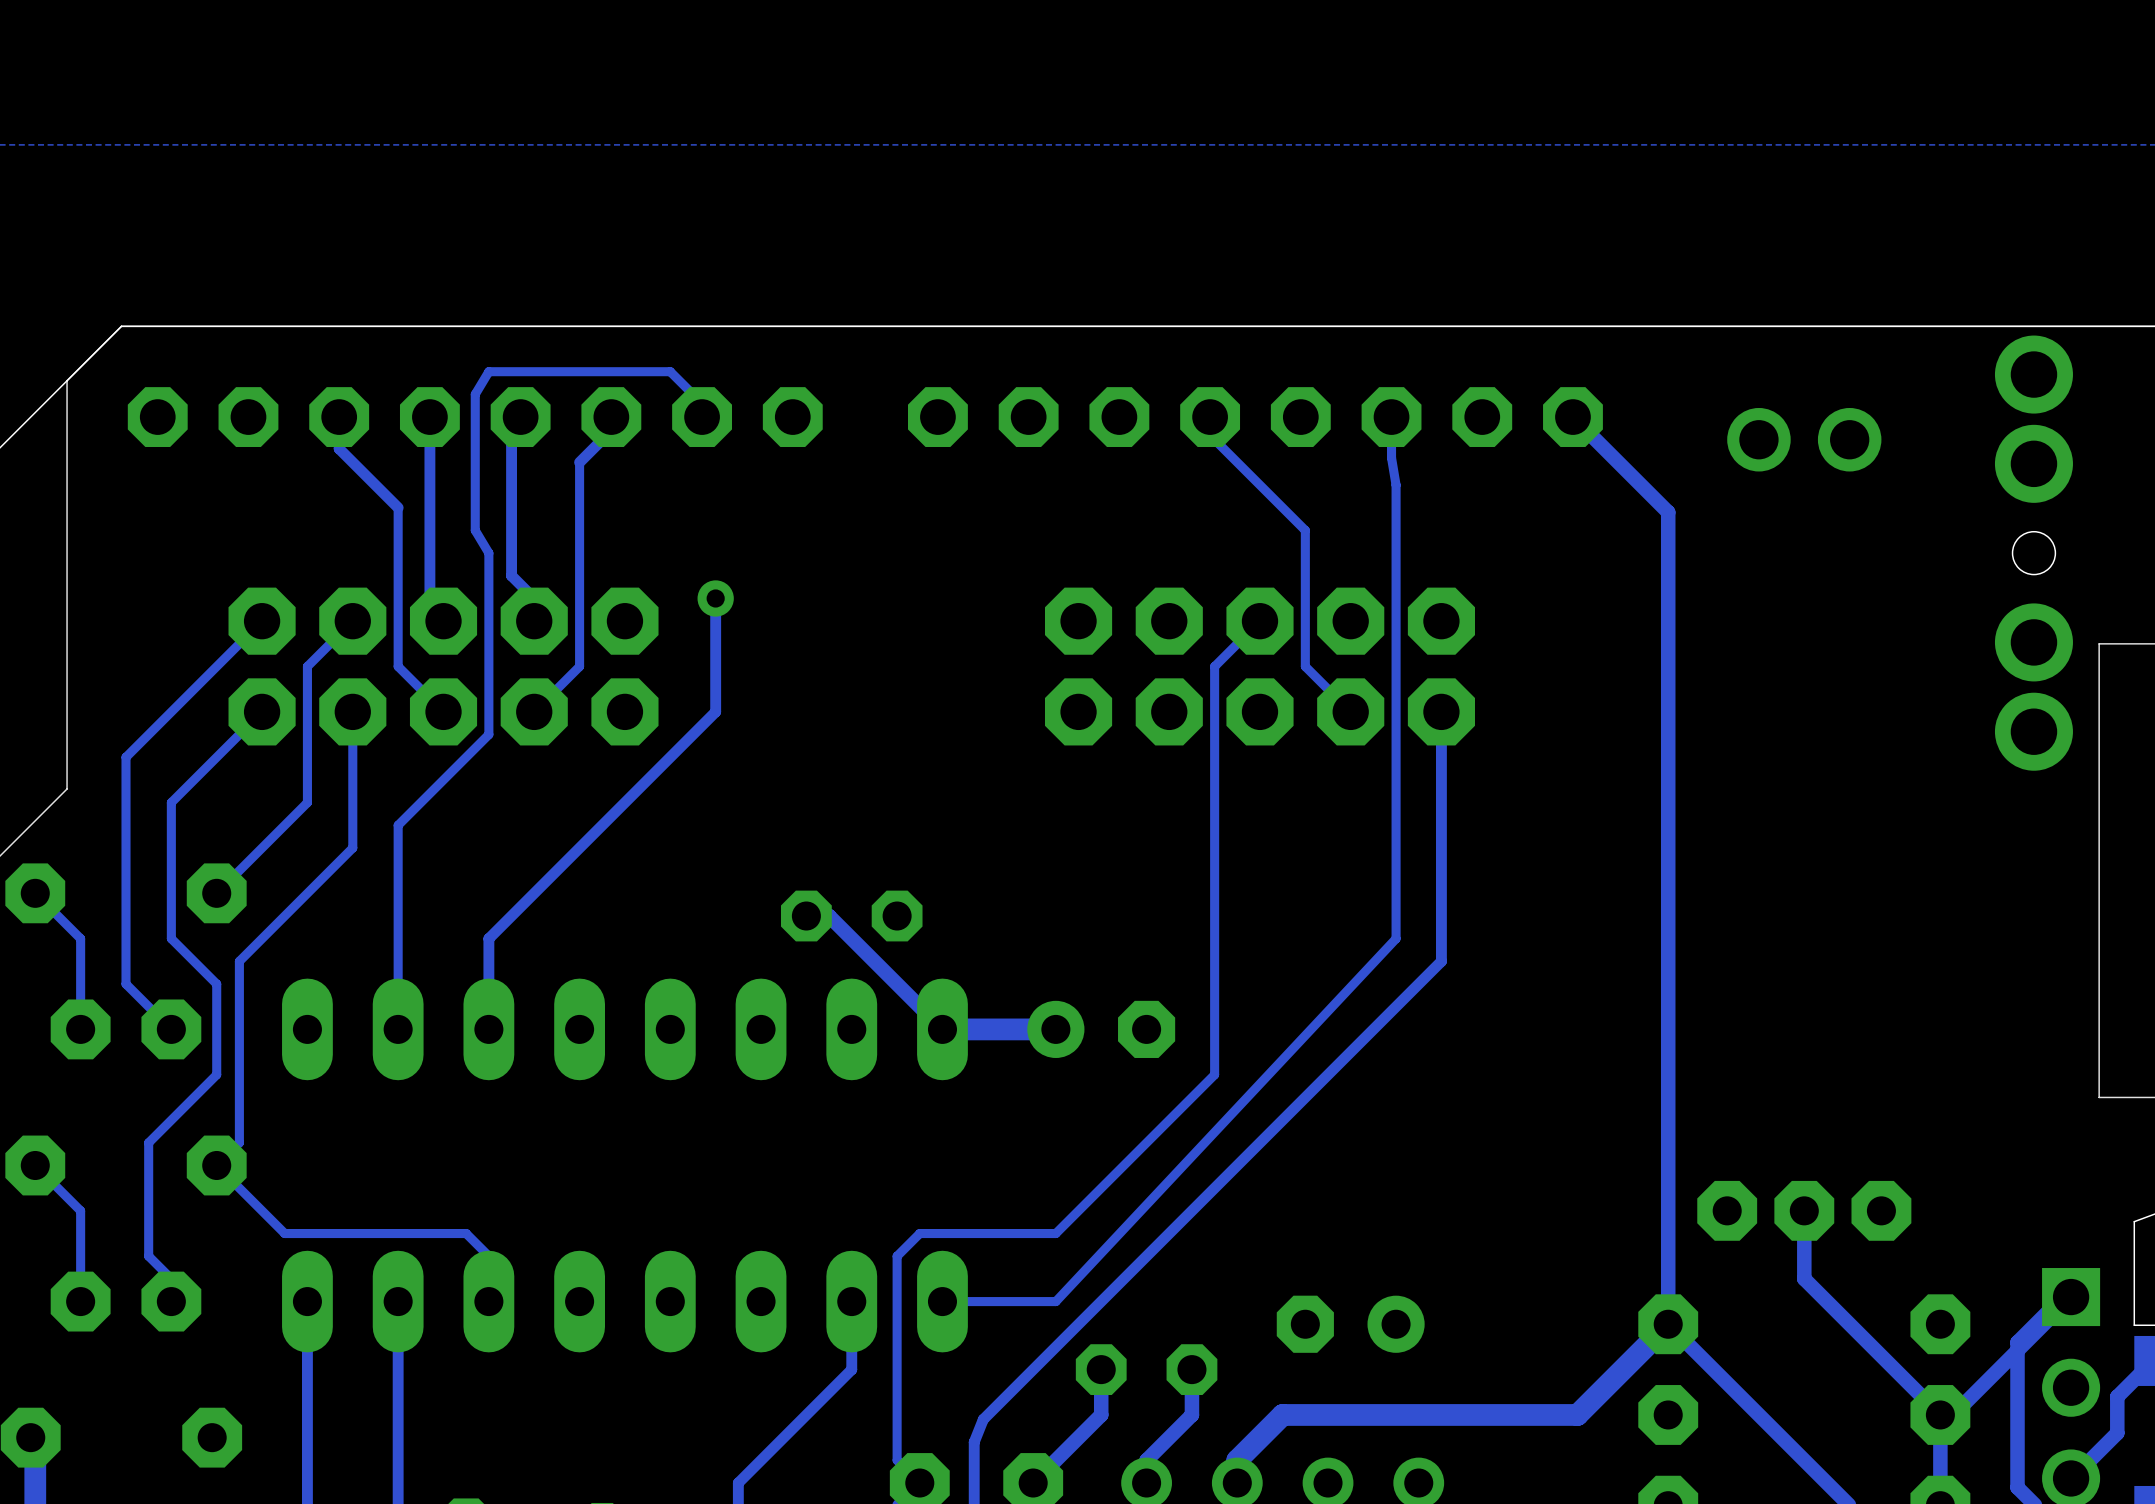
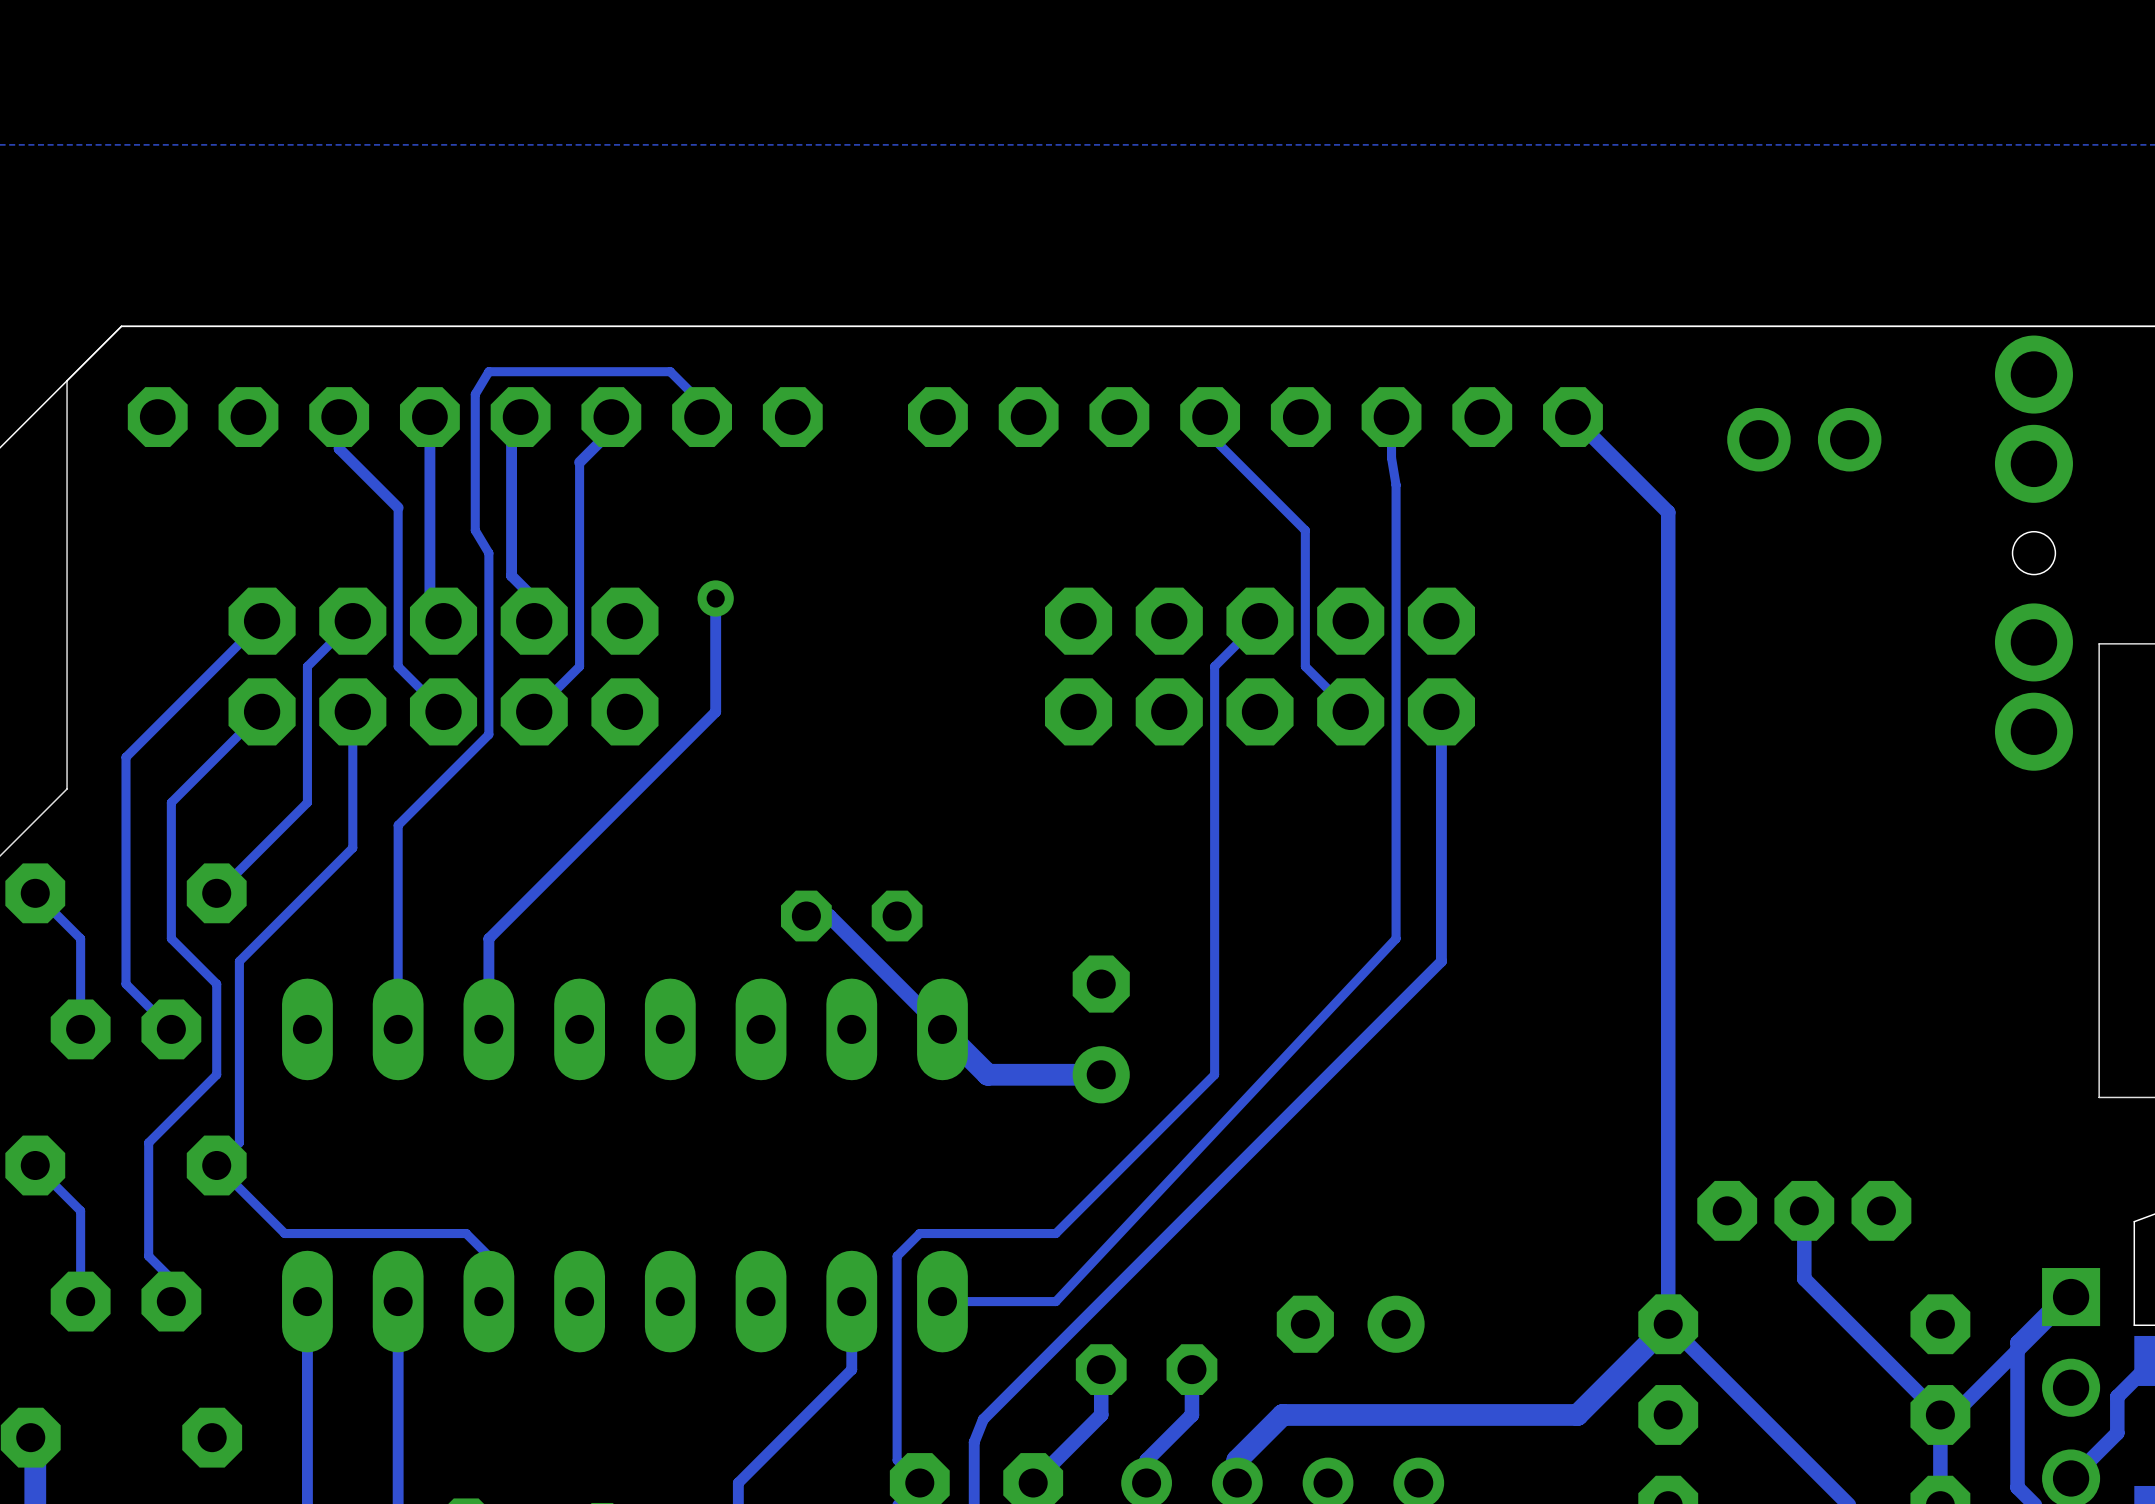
track: (1055, 1029) (942, 1029) -> (1101, 1074) (987, 1074) (942, 1029)
part rotation: 0° (1101, 1029) -> 90° counterclockwise (1101, 1029)

